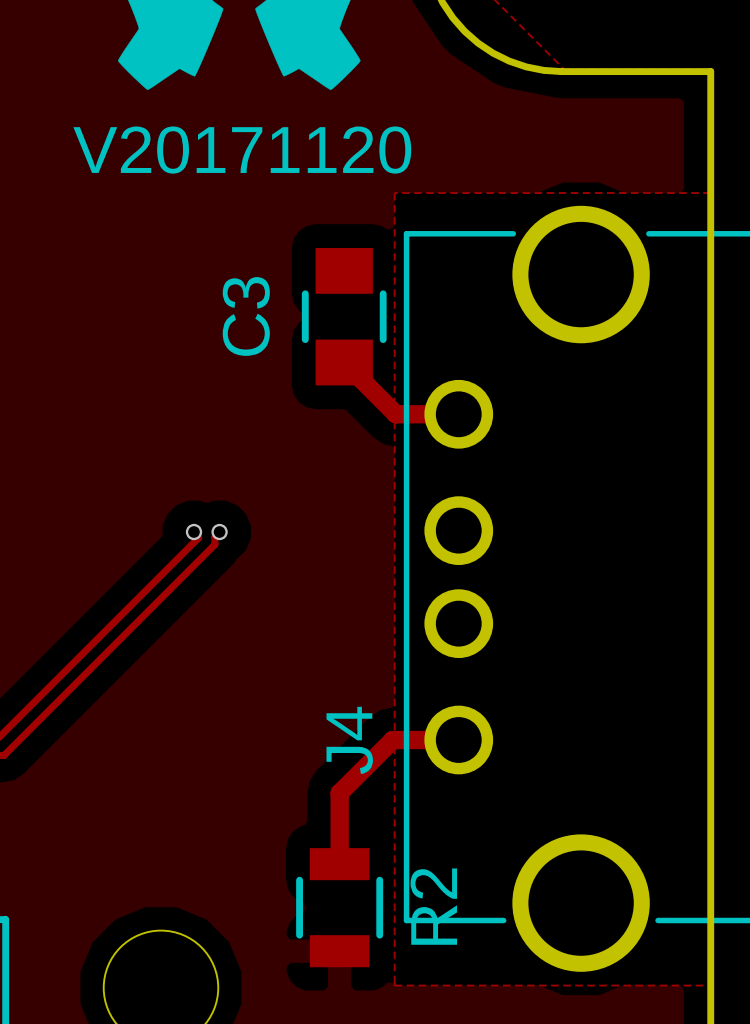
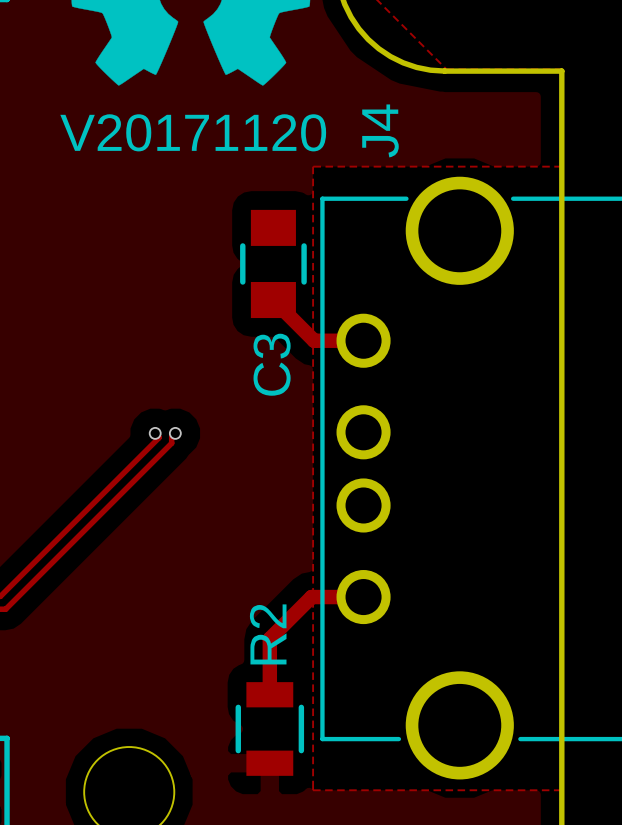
C3 name position: C3 (246, 316) -> C3 (272, 364)
J4 name position: J4 (349, 740) -> J4 (380, 130)
R2 name position: R2 (433, 906) -> R2 (268, 634)

